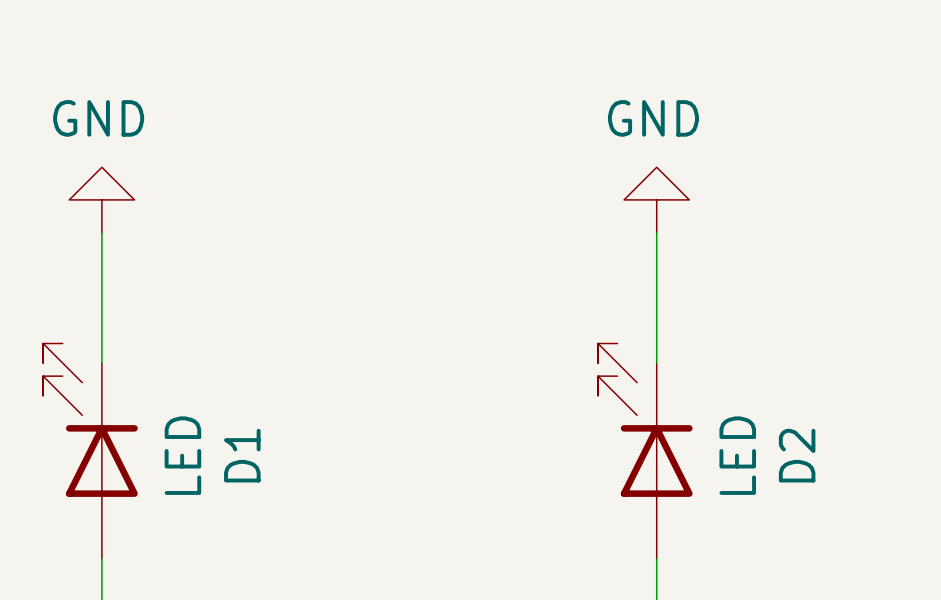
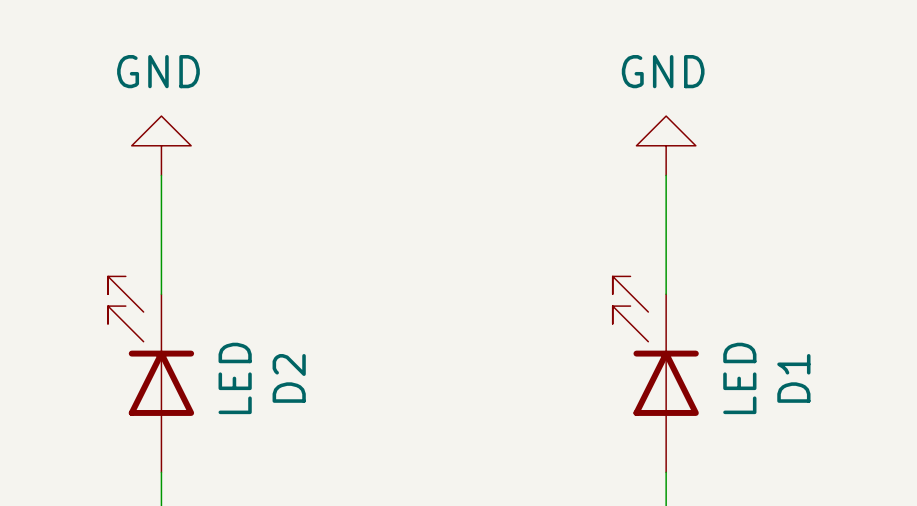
D1 name: D1 (242, 455) -> D2 (289, 378)
D2 name: D2 (797, 455) -> D1 (793, 378)

